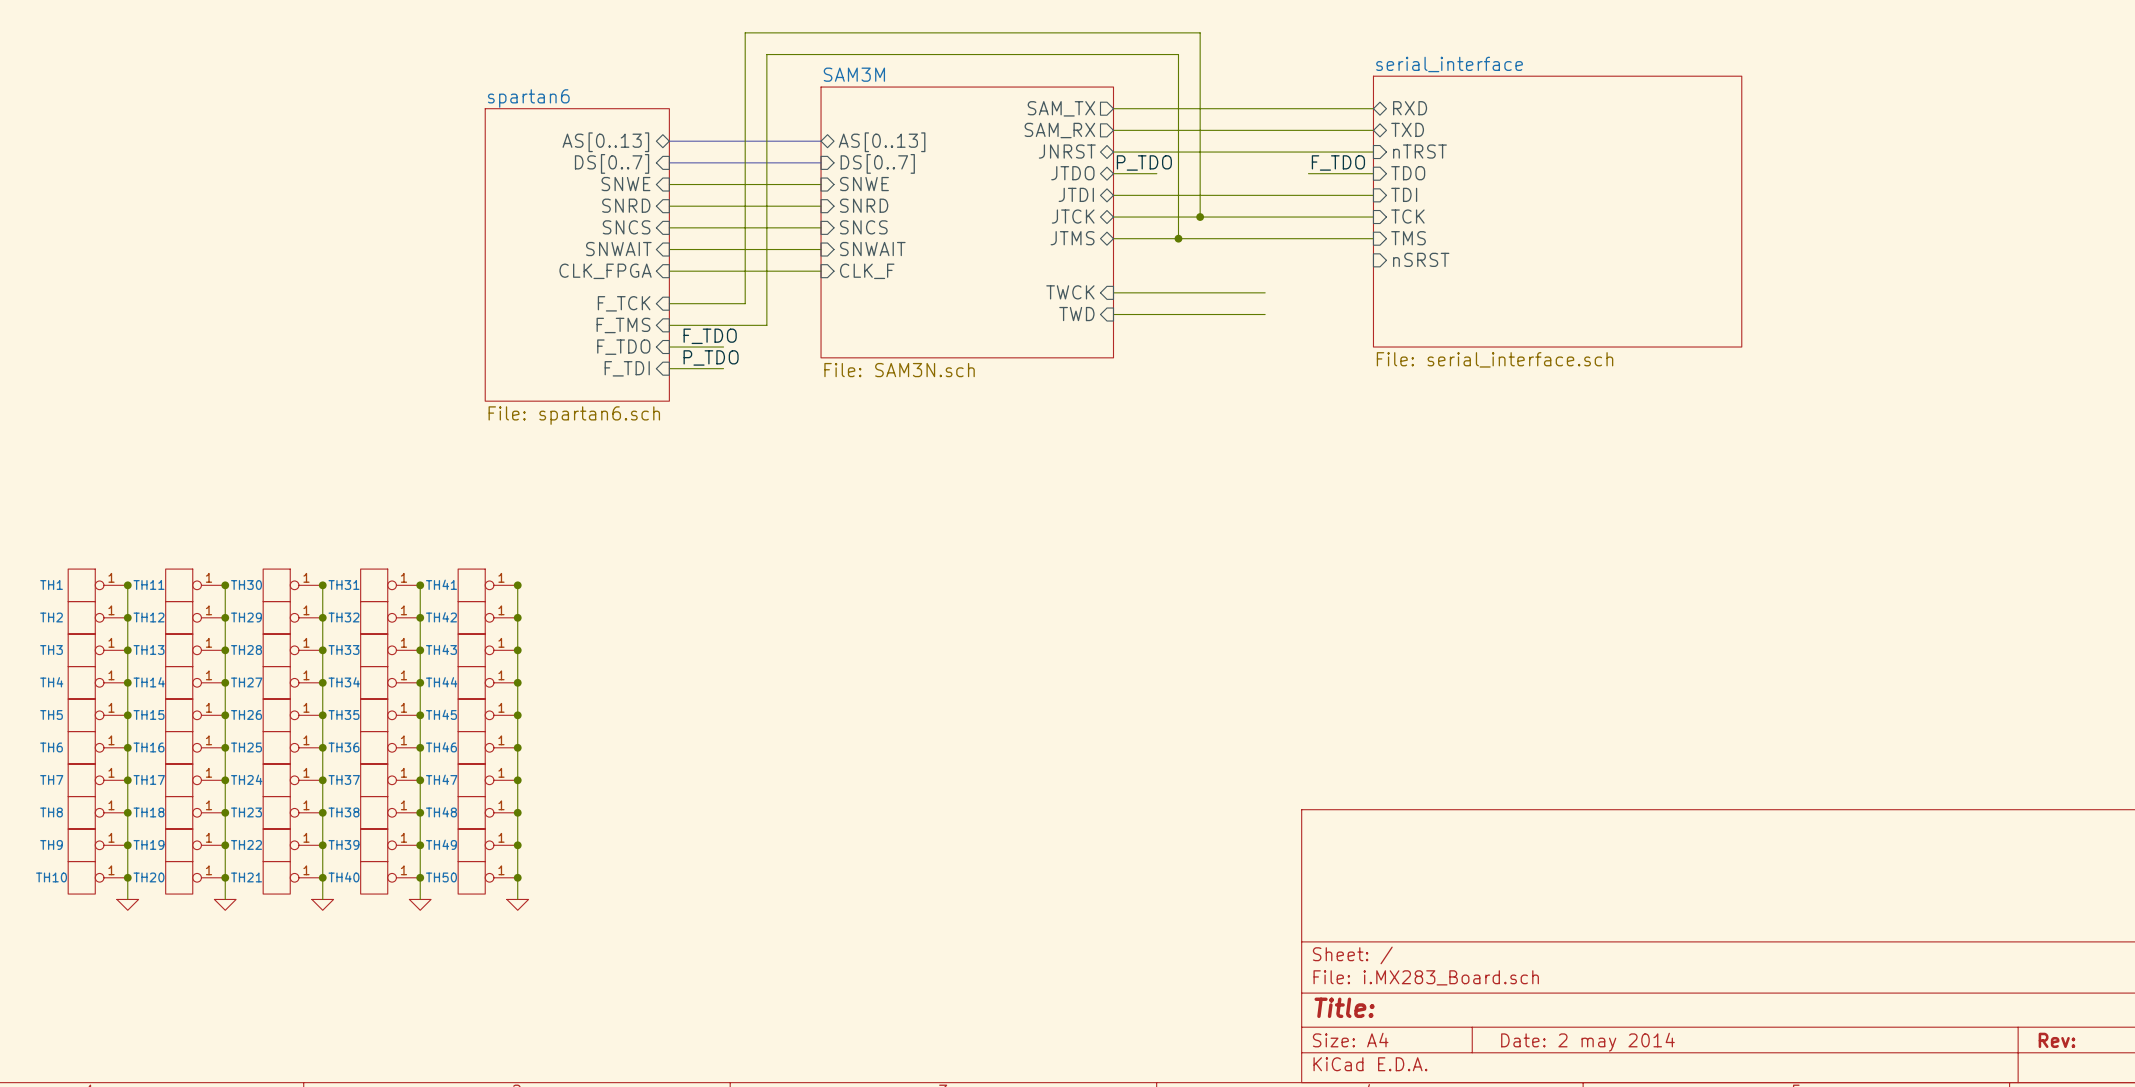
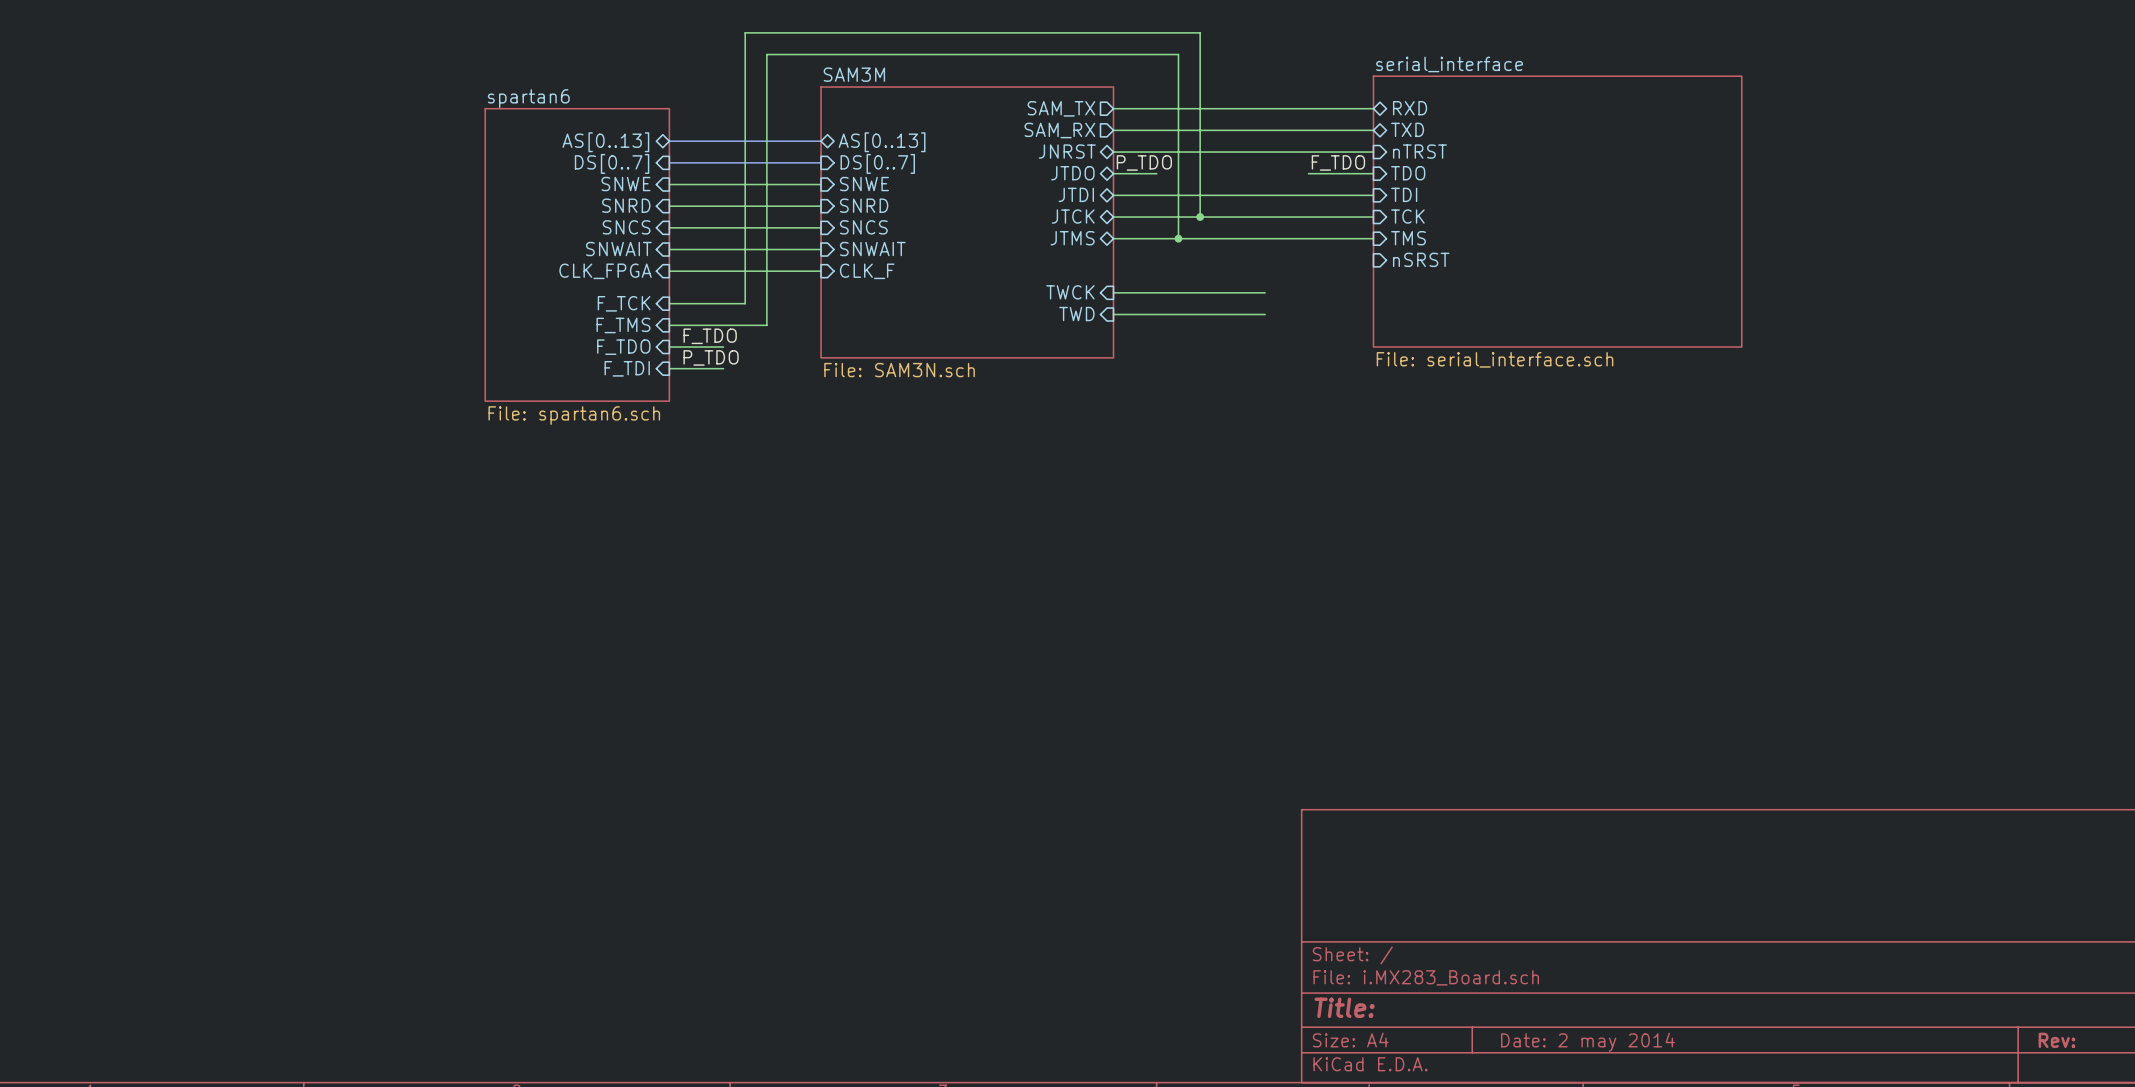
TH1: (97, 585) -> none
wire: (127, 585) (127, 899) -> none
junction: (127, 585) -> none
TH11: (195, 585) -> none
wire: (225, 585) (225, 899) -> none
junction: (225, 585) -> none
TH30: (292, 585) -> none
wire: (322, 585) (322, 899) -> none
junction: (322, 585) -> none
TH31: (390, 585) -> none
wire: (420, 585) (420, 899) -> none
junction: (420, 585) -> none
TH41: (487, 585) -> none
wire: (517, 585) (517, 899) -> none
junction: (517, 585) -> none
TH2: (97, 617) -> none
junction: (127, 617) -> none
TH12: (195, 617) -> none
junction: (225, 617) -> none
TH29: (292, 617) -> none
junction: (322, 617) -> none
TH32: (390, 617) -> none
junction: (420, 617) -> none
TH42: (487, 617) -> none
junction: (517, 617) -> none
TH3: (97, 650) -> none
junction: (127, 650) -> none
TH13: (195, 650) -> none
junction: (225, 650) -> none
TH28: (292, 650) -> none
junction: (322, 650) -> none
TH33: (390, 650) -> none
junction: (420, 650) -> none
TH43: (487, 650) -> none
junction: (517, 650) -> none
TH4: (97, 682) -> none
junction: (127, 682) -> none
TH14: (195, 682) -> none
junction: (225, 682) -> none
TH27: (292, 682) -> none
junction: (322, 682) -> none
TH34: (390, 682) -> none
junction: (420, 682) -> none
TH44: (487, 682) -> none
junction: (517, 682) -> none
TH5: (97, 715) -> none
junction: (127, 715) -> none
TH15: (195, 715) -> none
junction: (225, 715) -> none
TH26: (292, 715) -> none
junction: (322, 715) -> none
TH35: (390, 715) -> none
junction: (420, 715) -> none
TH45: (487, 715) -> none
junction: (517, 715) -> none
TH6: (97, 747) -> none
junction: (127, 747) -> none
TH16: (195, 747) -> none
junction: (225, 747) -> none
TH25: (292, 747) -> none
junction: (322, 747) -> none
TH36: (390, 747) -> none
junction: (420, 747) -> none
TH46: (487, 747) -> none
junction: (517, 747) -> none
TH7: (97, 780) -> none
junction: (127, 780) -> none
TH17: (195, 780) -> none
junction: (225, 780) -> none
TH24: (292, 780) -> none
junction: (322, 780) -> none
TH37: (390, 780) -> none
junction: (420, 780) -> none
TH47: (487, 780) -> none
junction: (517, 780) -> none
TH8: (97, 812) -> none
junction: (127, 812) -> none
TH18: (195, 812) -> none
junction: (225, 812) -> none
TH23: (292, 812) -> none
junction: (322, 812) -> none
TH38: (390, 812) -> none
junction: (420, 812) -> none
TH48: (487, 812) -> none
junction: (517, 812) -> none
TH9: (97, 845) -> none
junction: (127, 845) -> none
TH19: (195, 845) -> none
junction: (225, 845) -> none
TH22: (292, 845) -> none
junction: (322, 845) -> none
TH39: (390, 845) -> none
junction: (420, 845) -> none
TH49: (487, 845) -> none
junction: (517, 845) -> none
TH10: (97, 877) -> none
junction: (127, 877) -> none
TH20: (195, 877) -> none
junction: (225, 877) -> none
TH21: (292, 877) -> none
junction: (322, 877) -> none
TH40: (390, 877) -> none
junction: (420, 877) -> none
TH50: (487, 877) -> none
junction: (517, 877) -> none
power symbol: (127, 904) -> none
power symbol: (225, 904) -> none
power symbol: (322, 904) -> none
power symbol: (420, 904) -> none
power symbol: (517, 904) -> none

